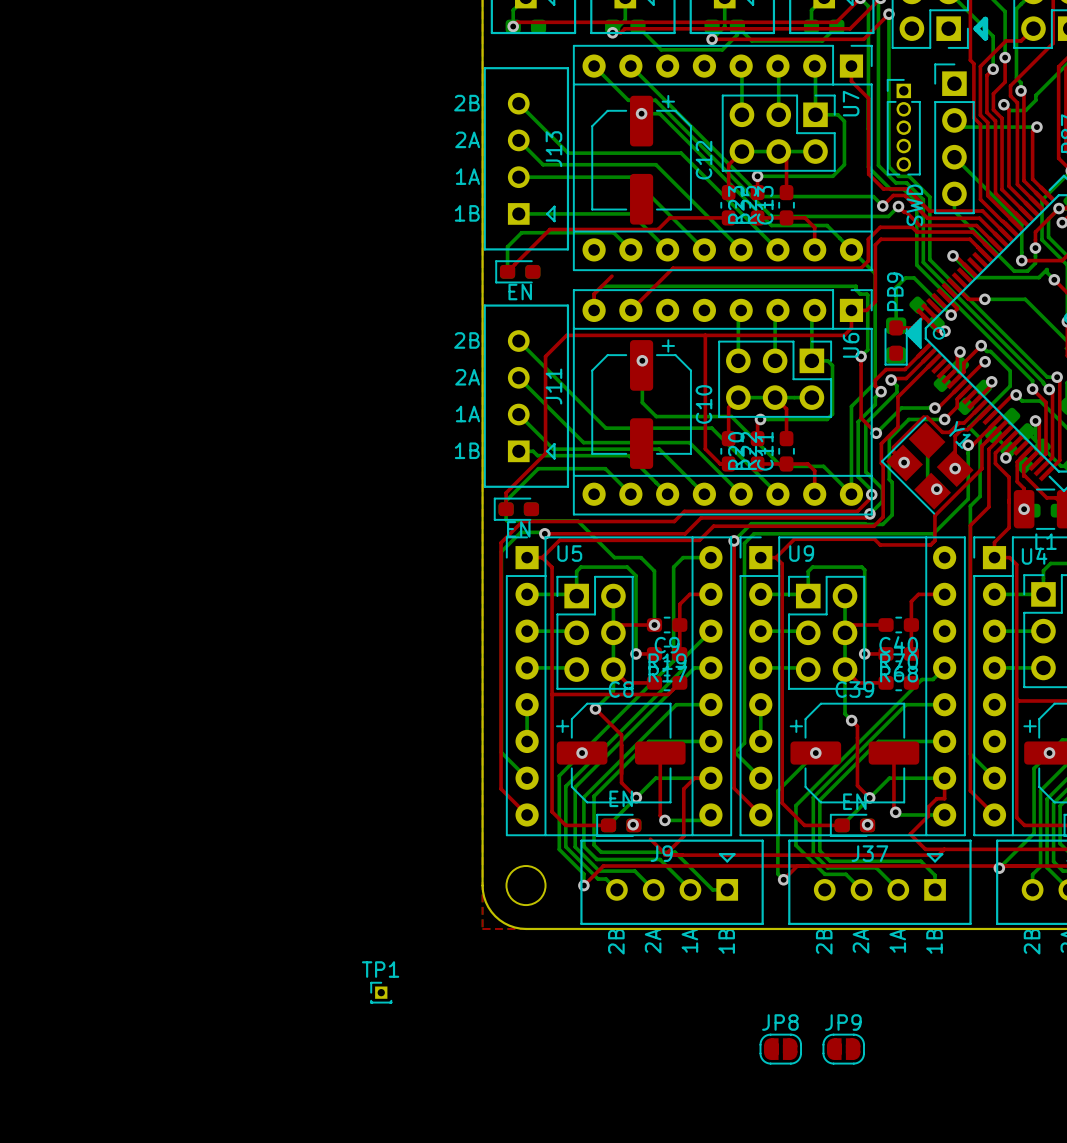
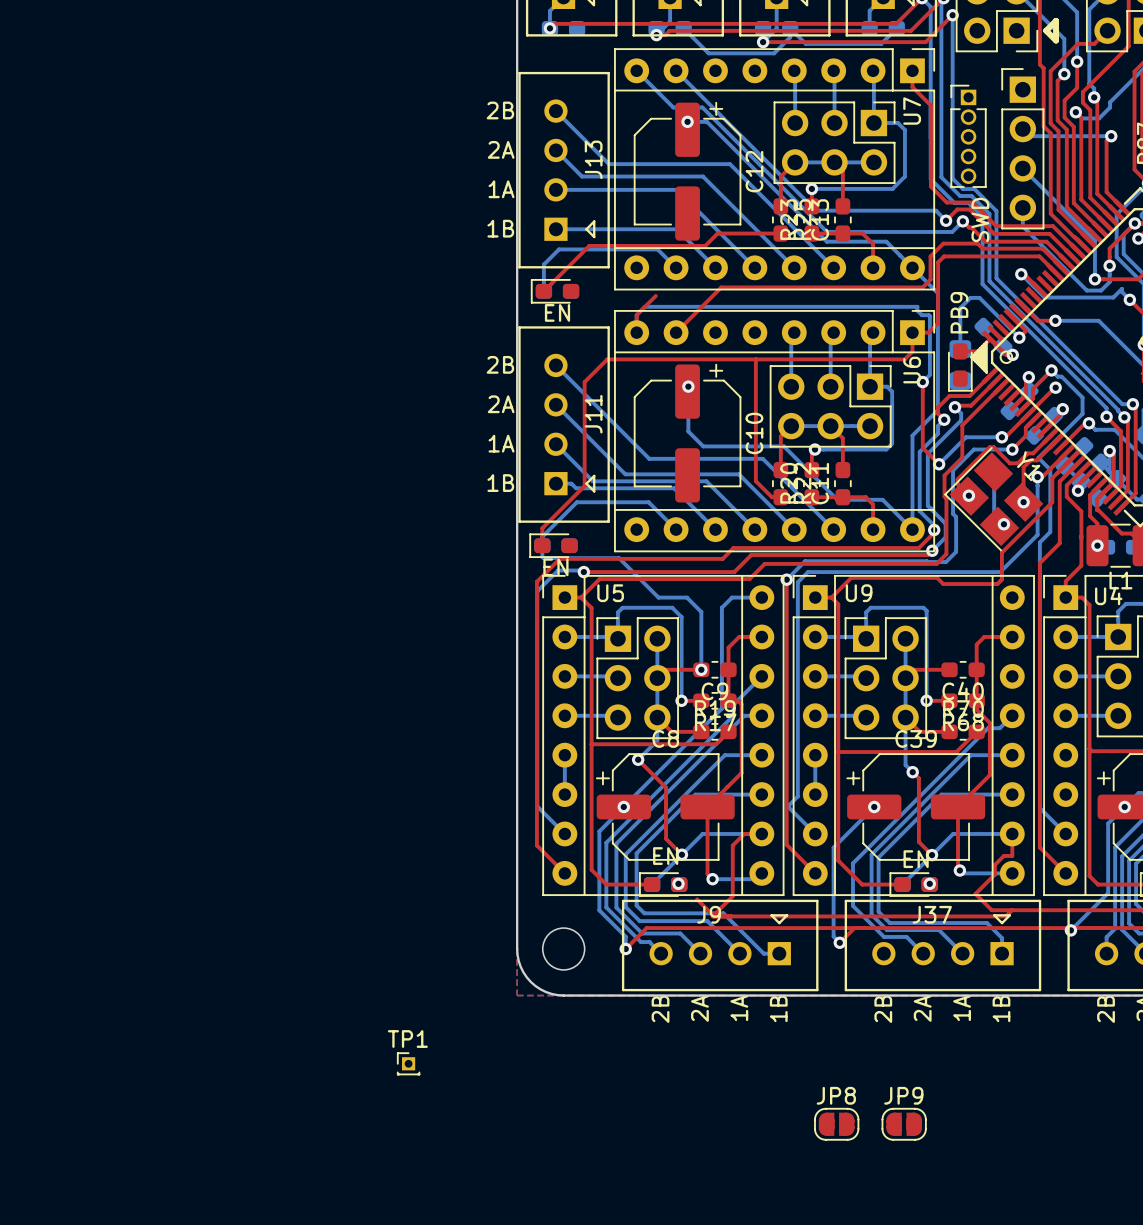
top track: none -> (728, 700) (738, 700) (741, 704) (741, 772) (707, 806)
top track: none -> (976, 700) (976, 709) (989, 722) (989, 775) (958, 806)
top track: none -> (976, 731) (956, 752) (838, 752)

